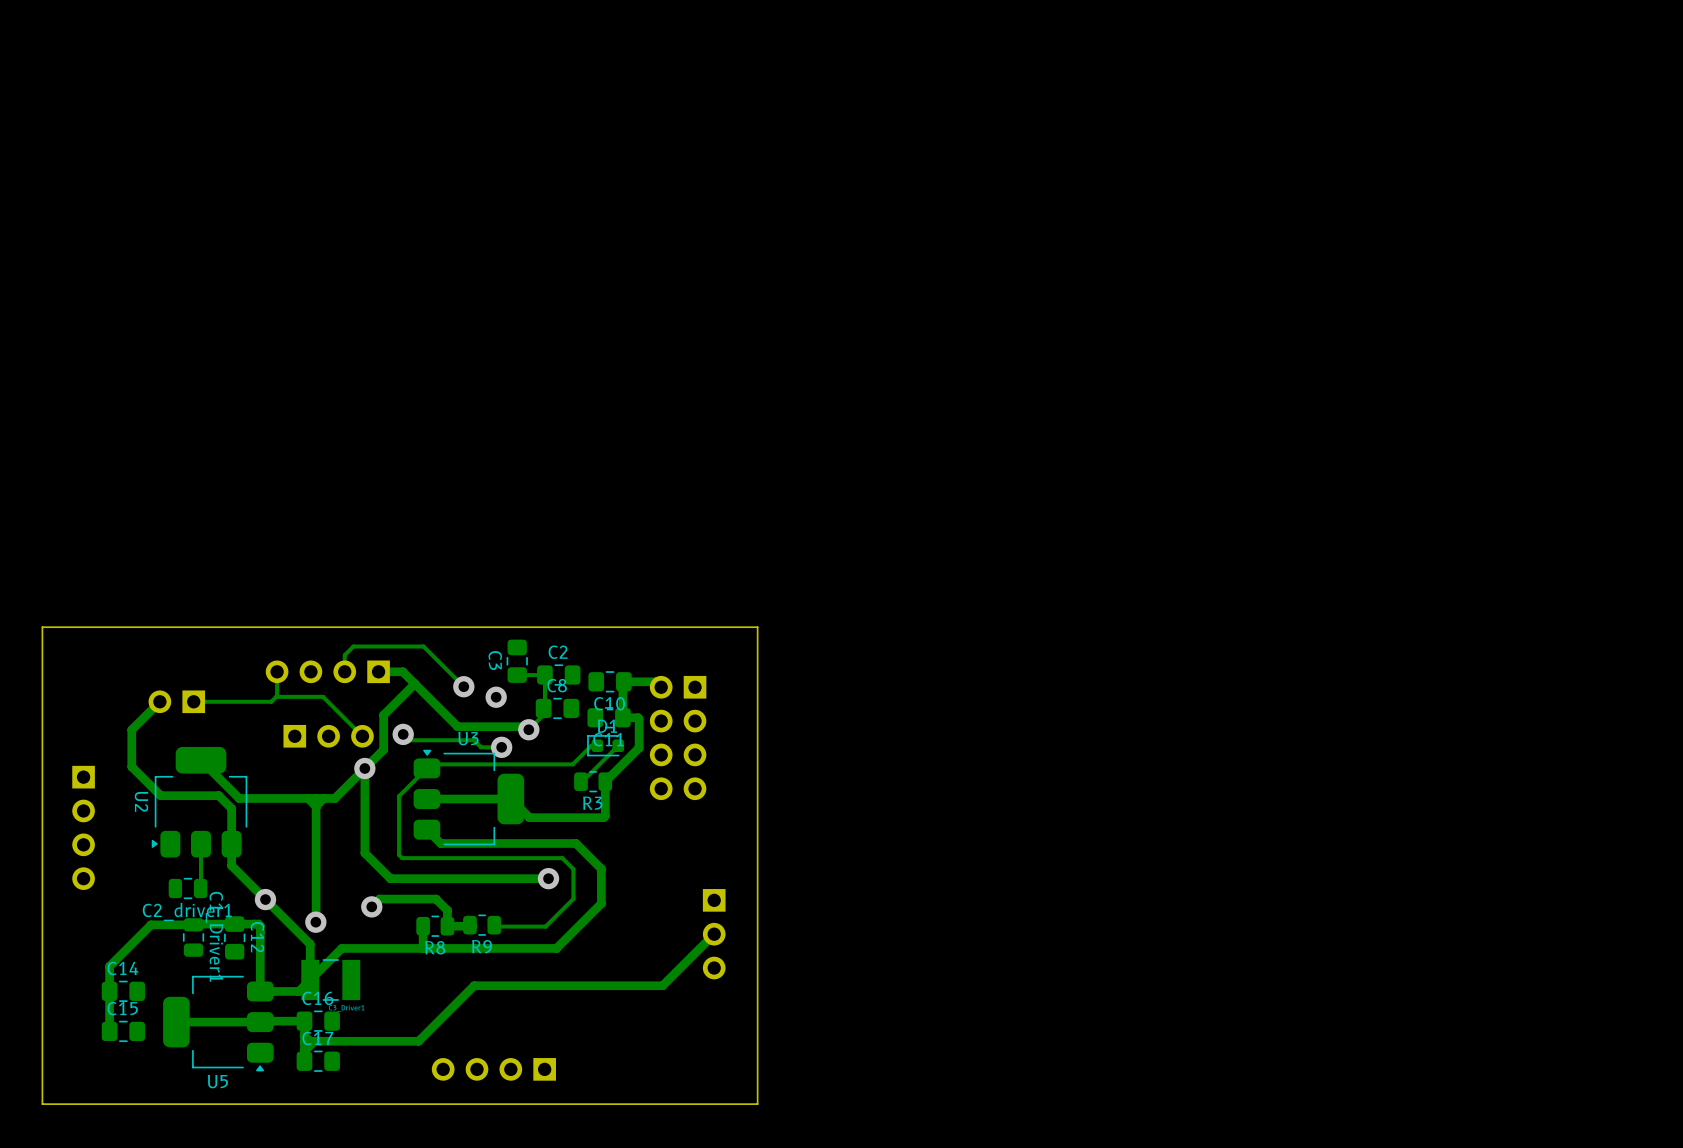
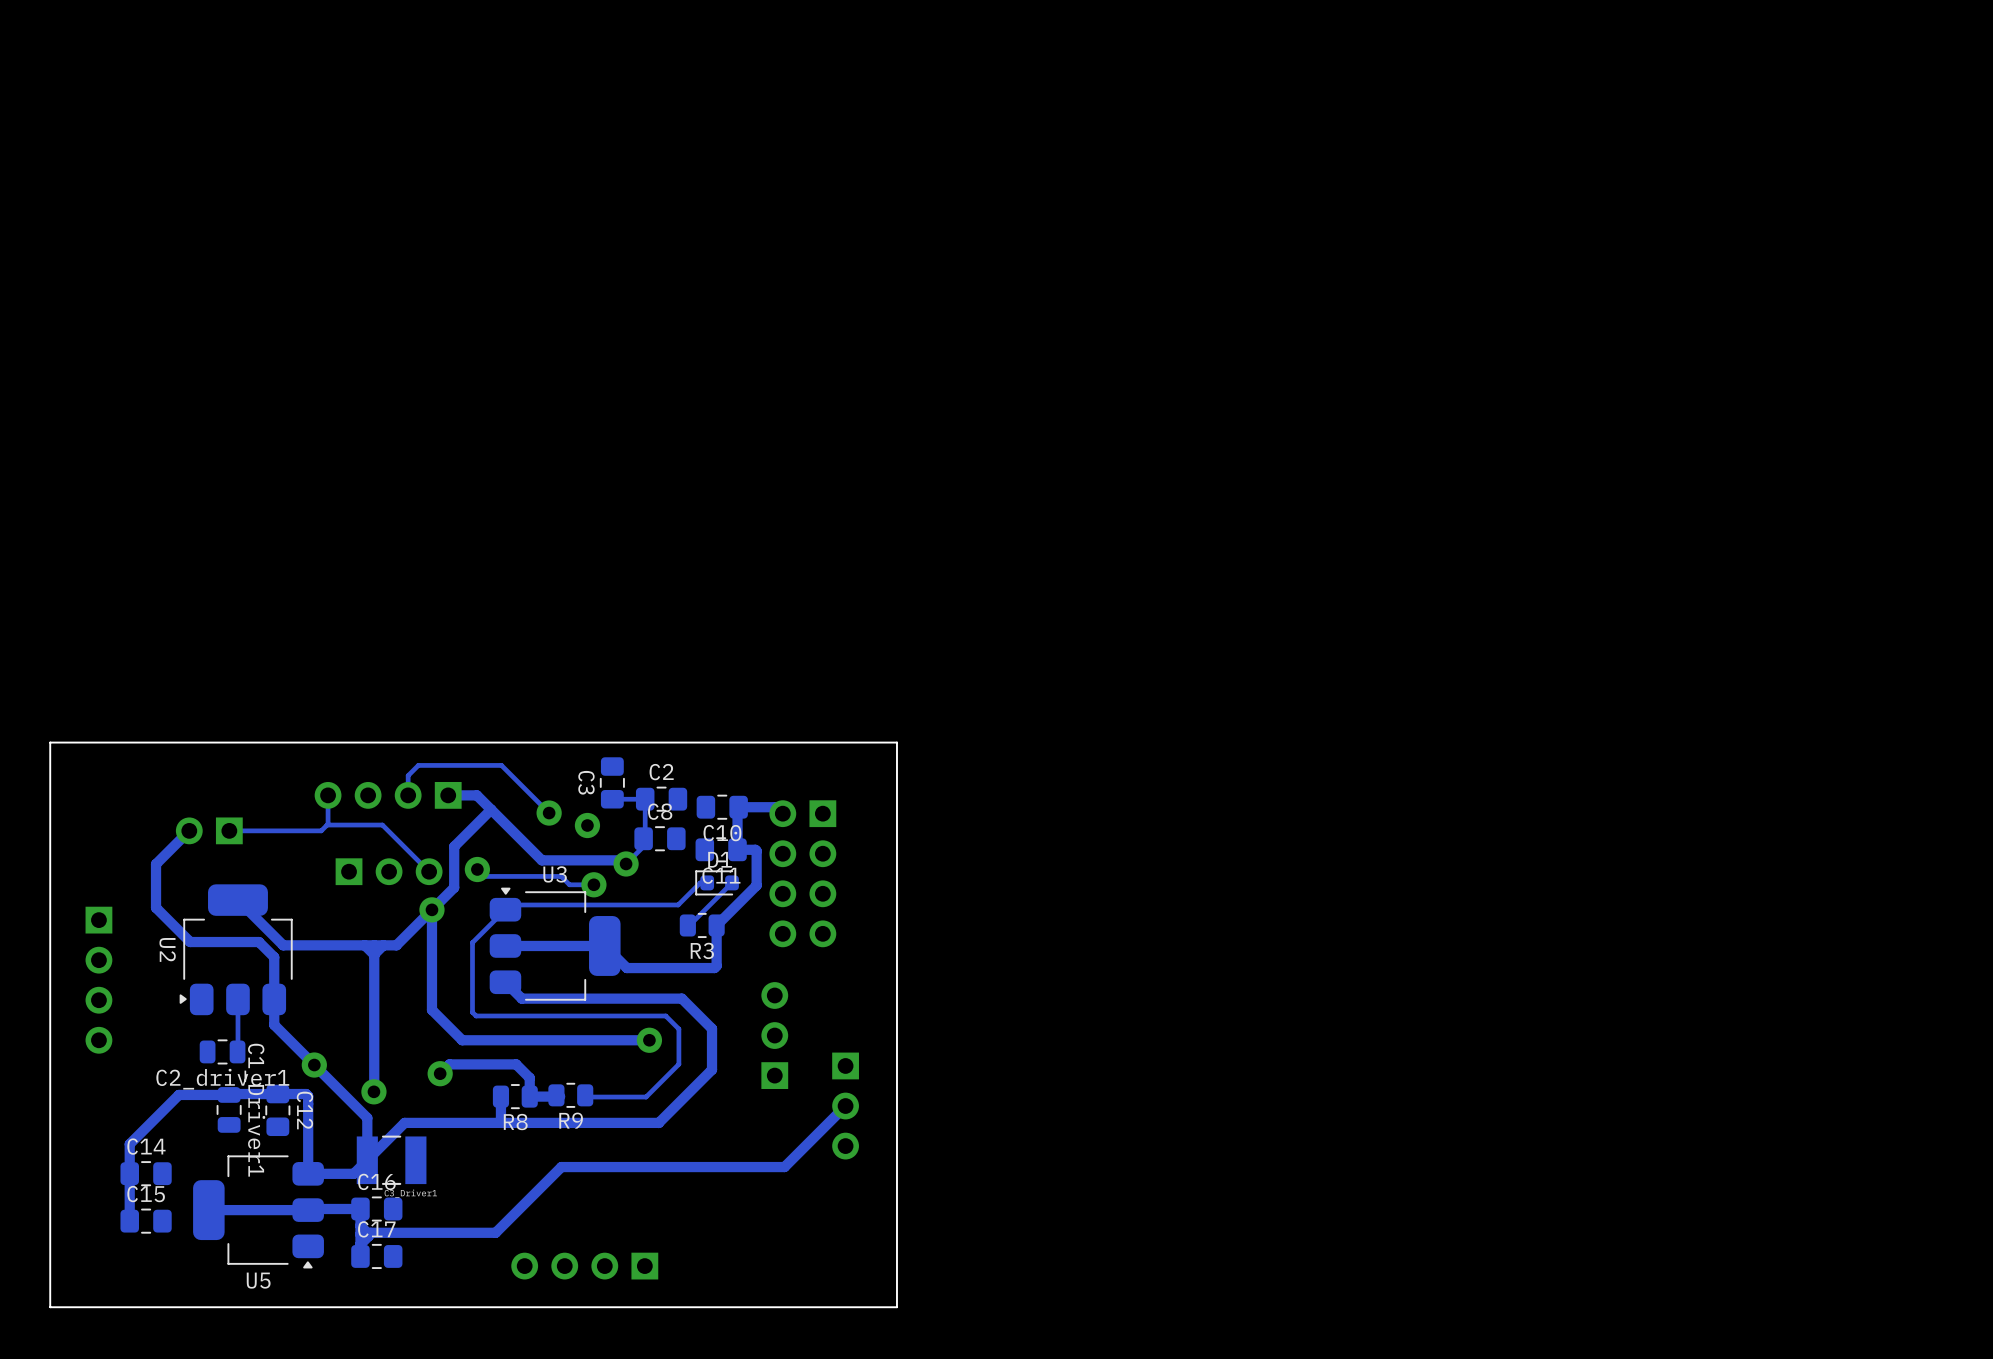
part: none -> (774, 1035)

